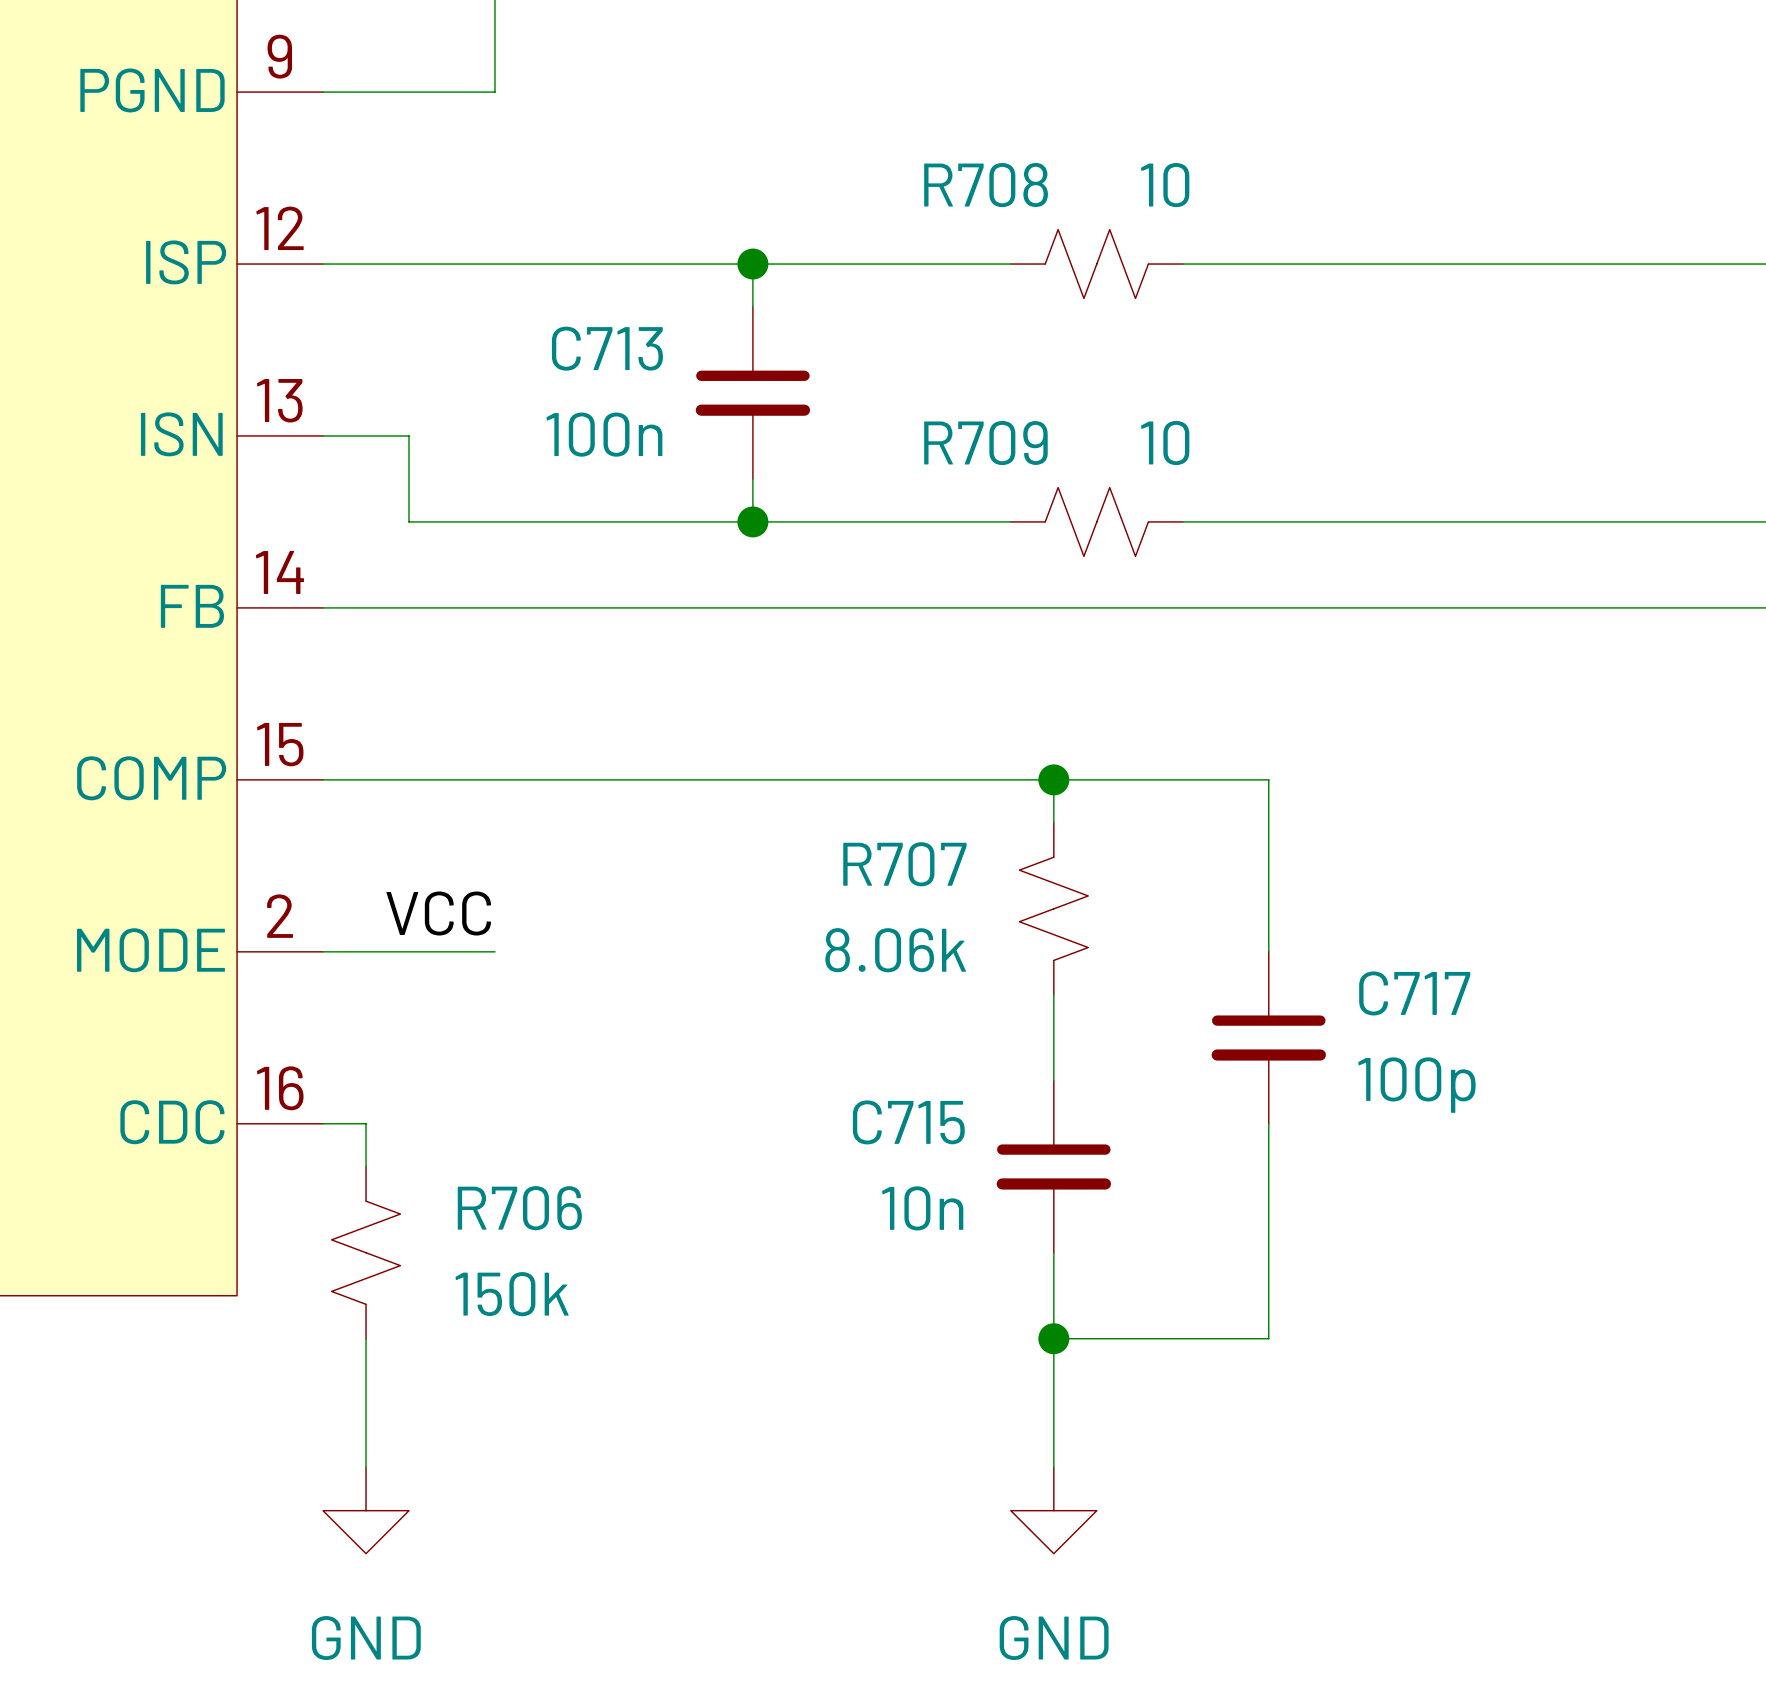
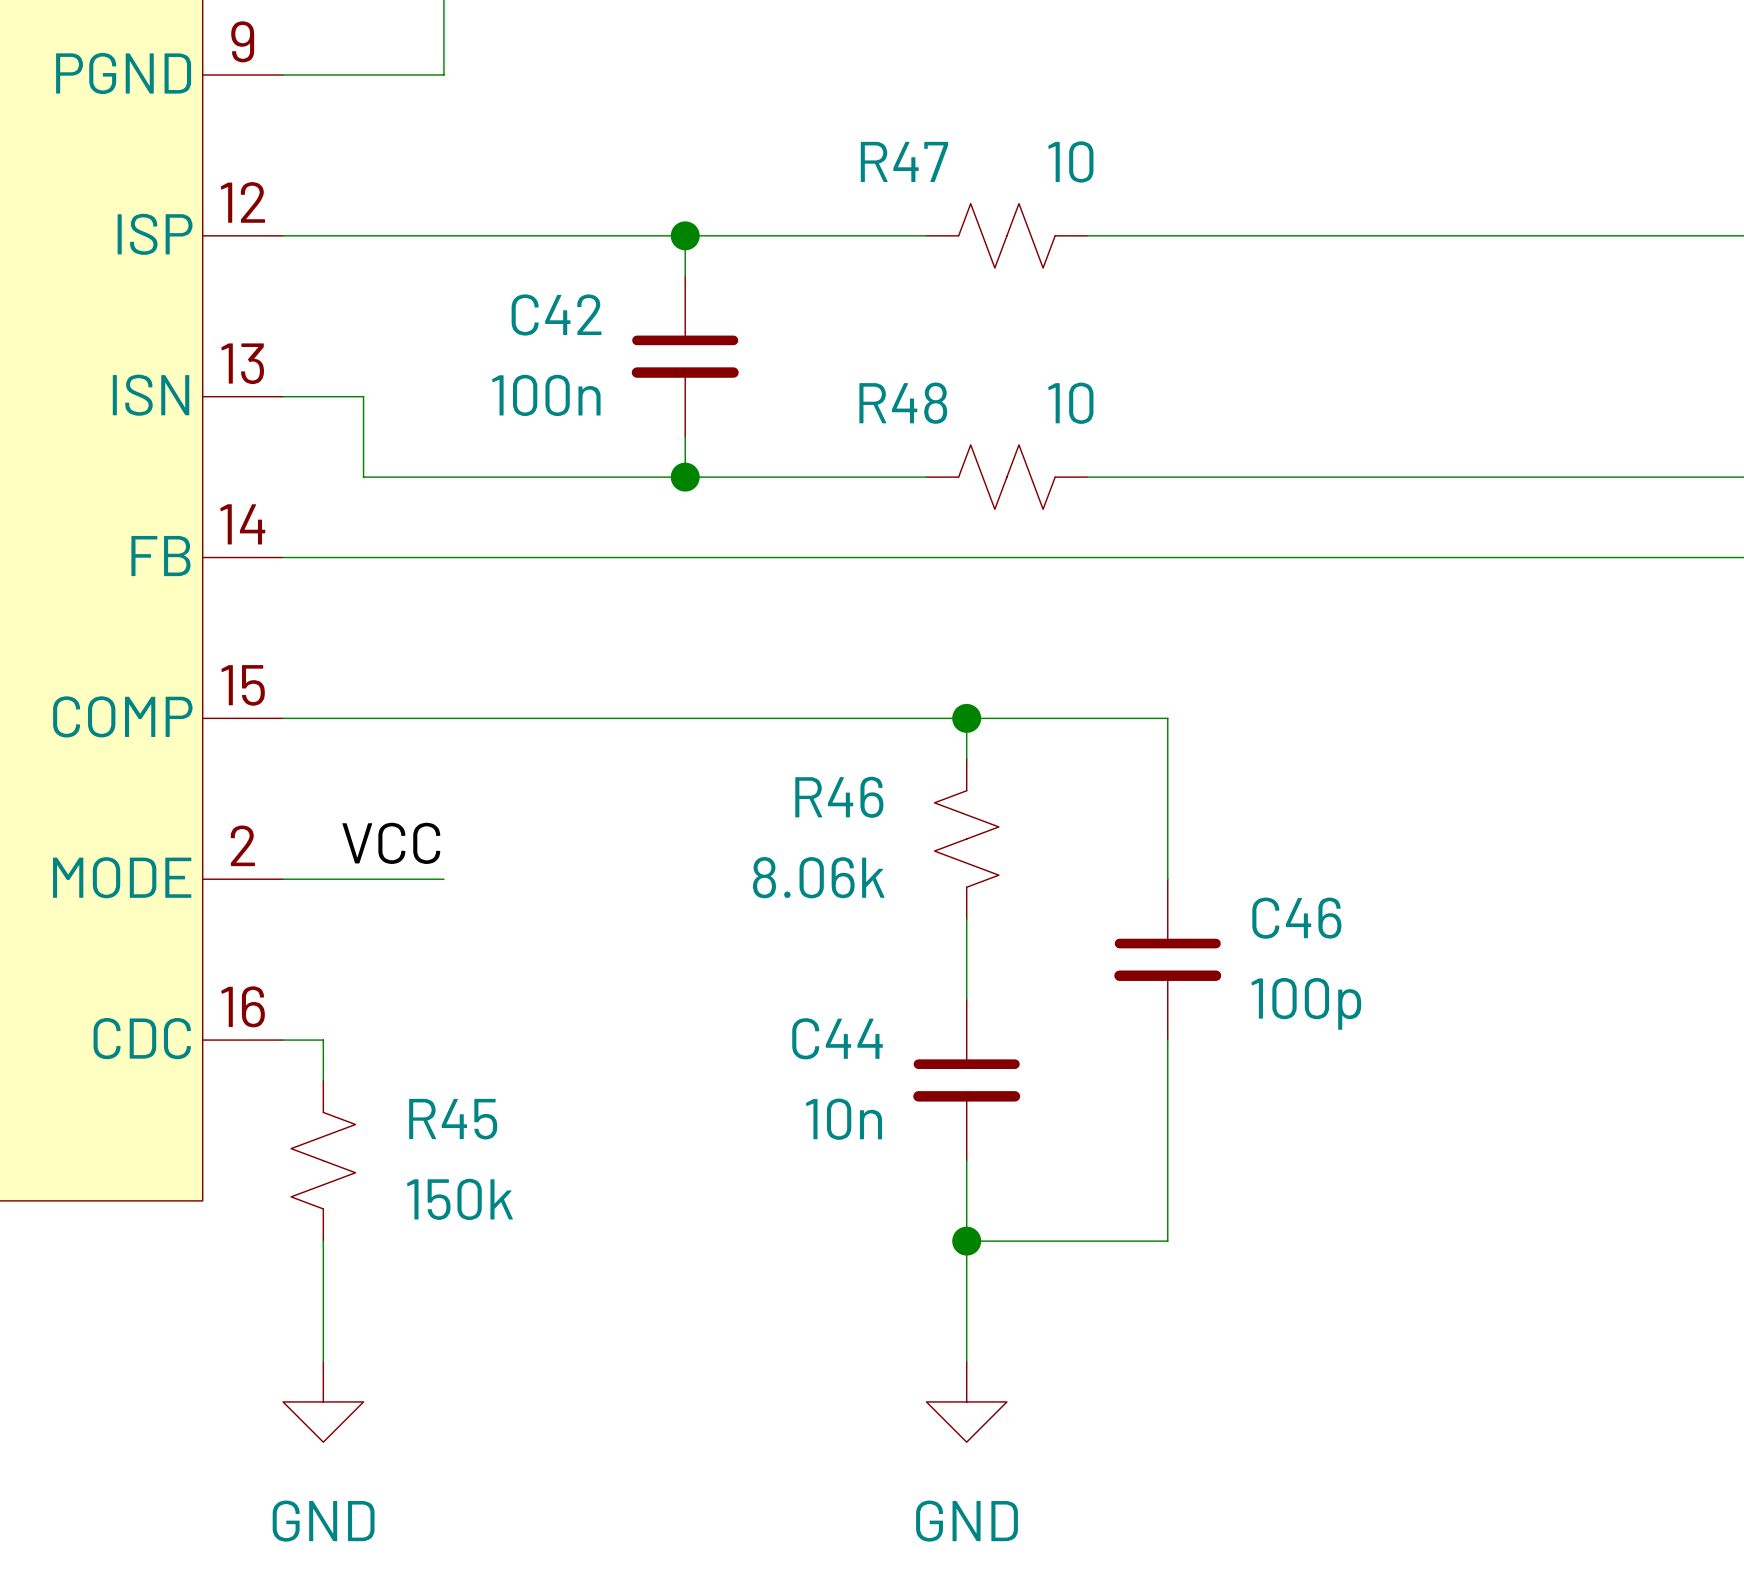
R708 name: R708 (986, 185) -> R47 (904, 161)
C713 name: C713 (607, 348) -> C42 (556, 314)
R709 name: R709 (985, 442) -> R48 (903, 403)
R707 name: R707 (904, 864) -> R46 (839, 797)
C717 name: C717 (1414, 993) -> C46 (1296, 918)
C715 name: C715 (908, 1122) -> C44 (837, 1038)
R706 name: R706 (519, 1208) -> R45 (453, 1119)

